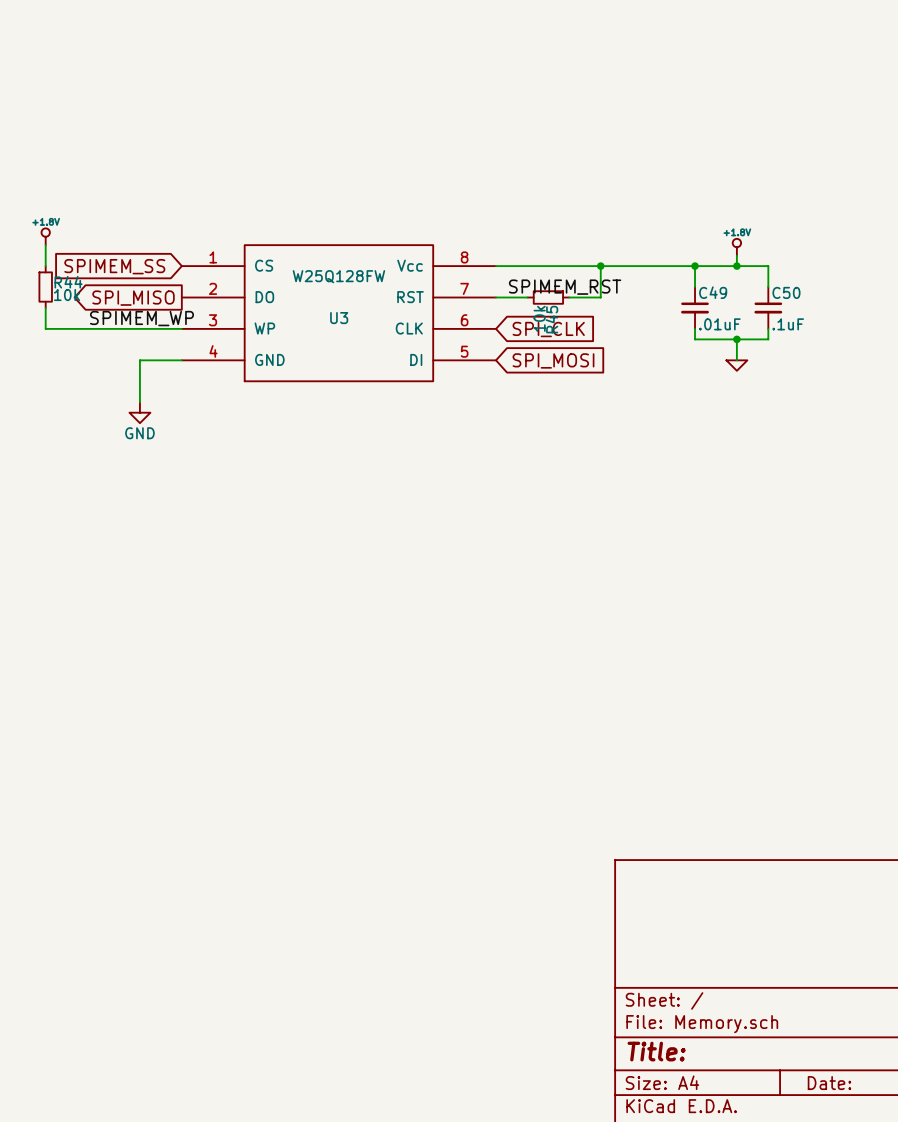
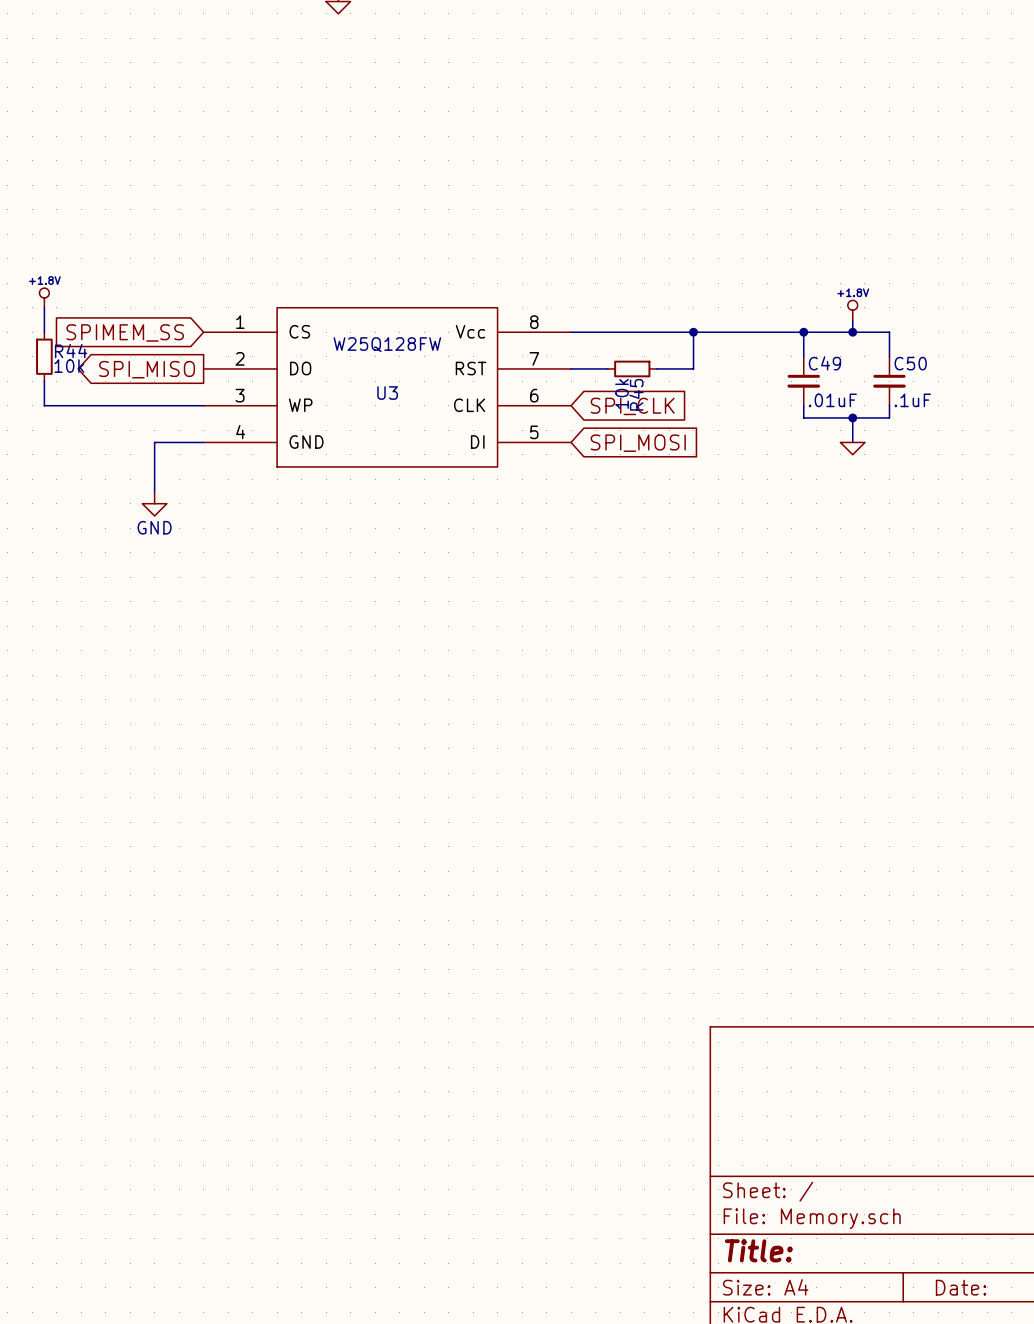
label: SPIMEM_RST (565, 287) -> none
label: SPIMEM_WP (141, 318) -> none

